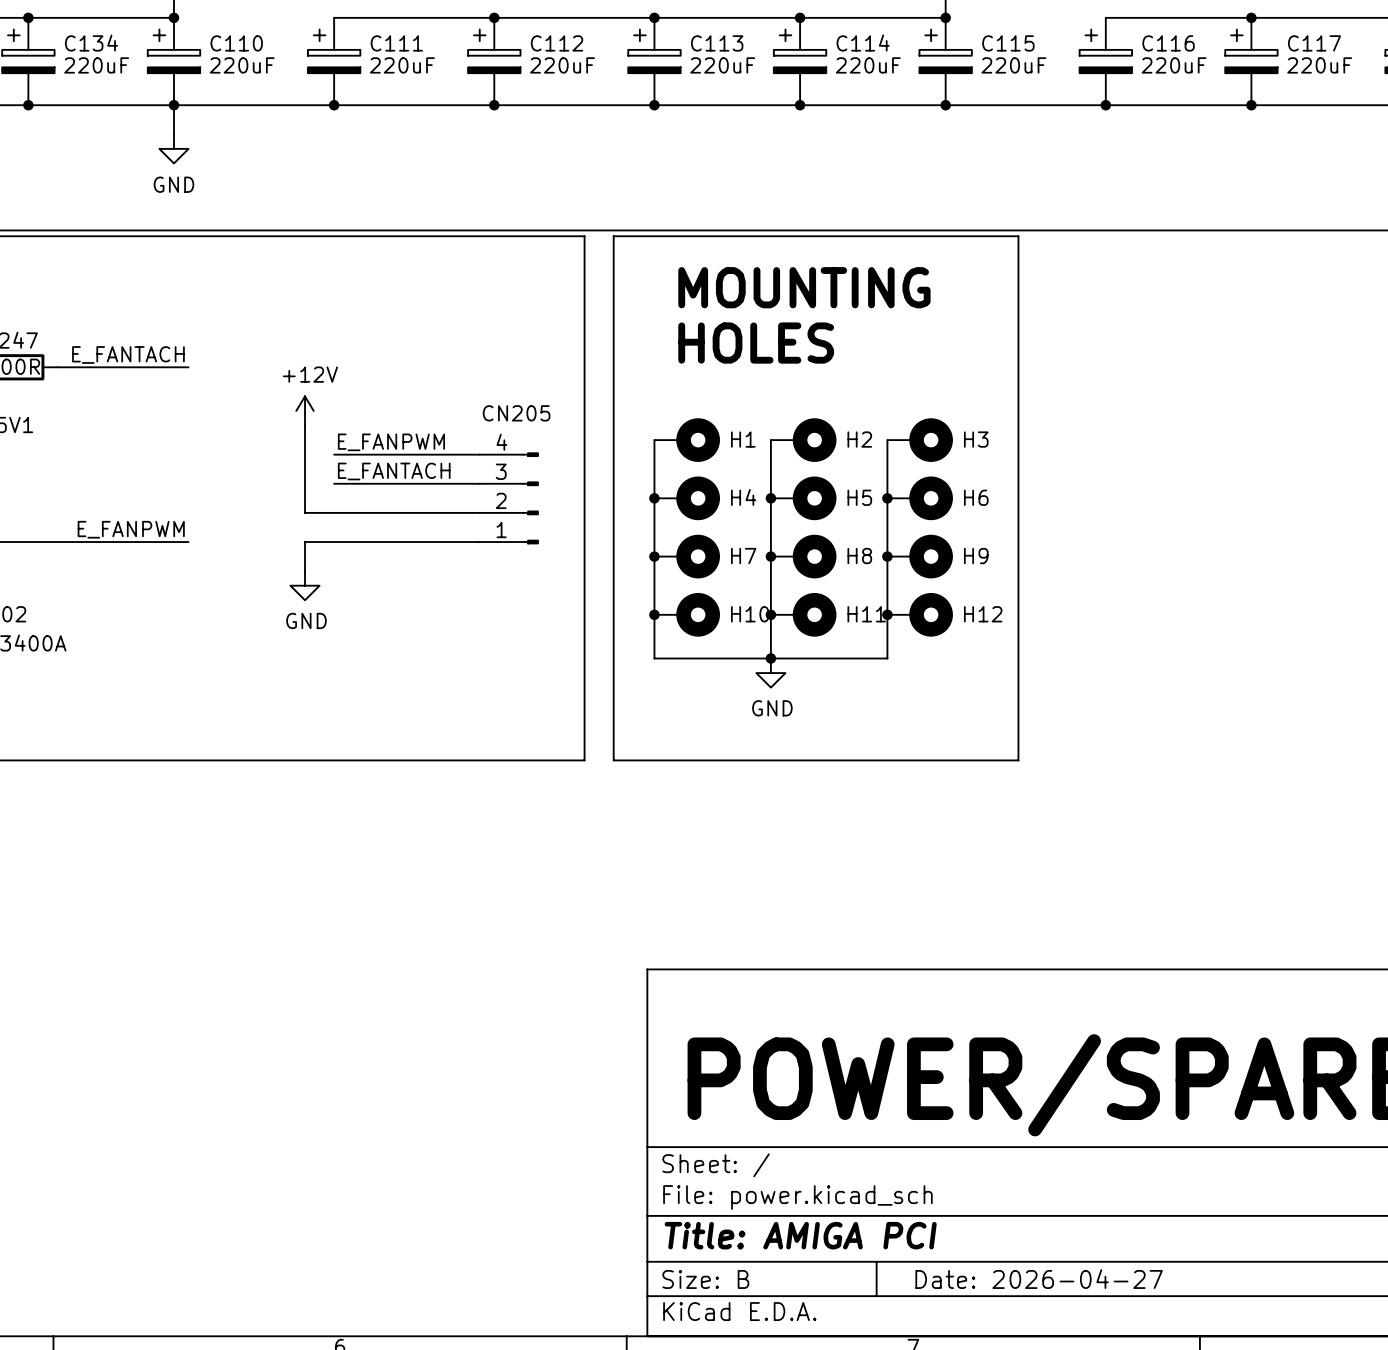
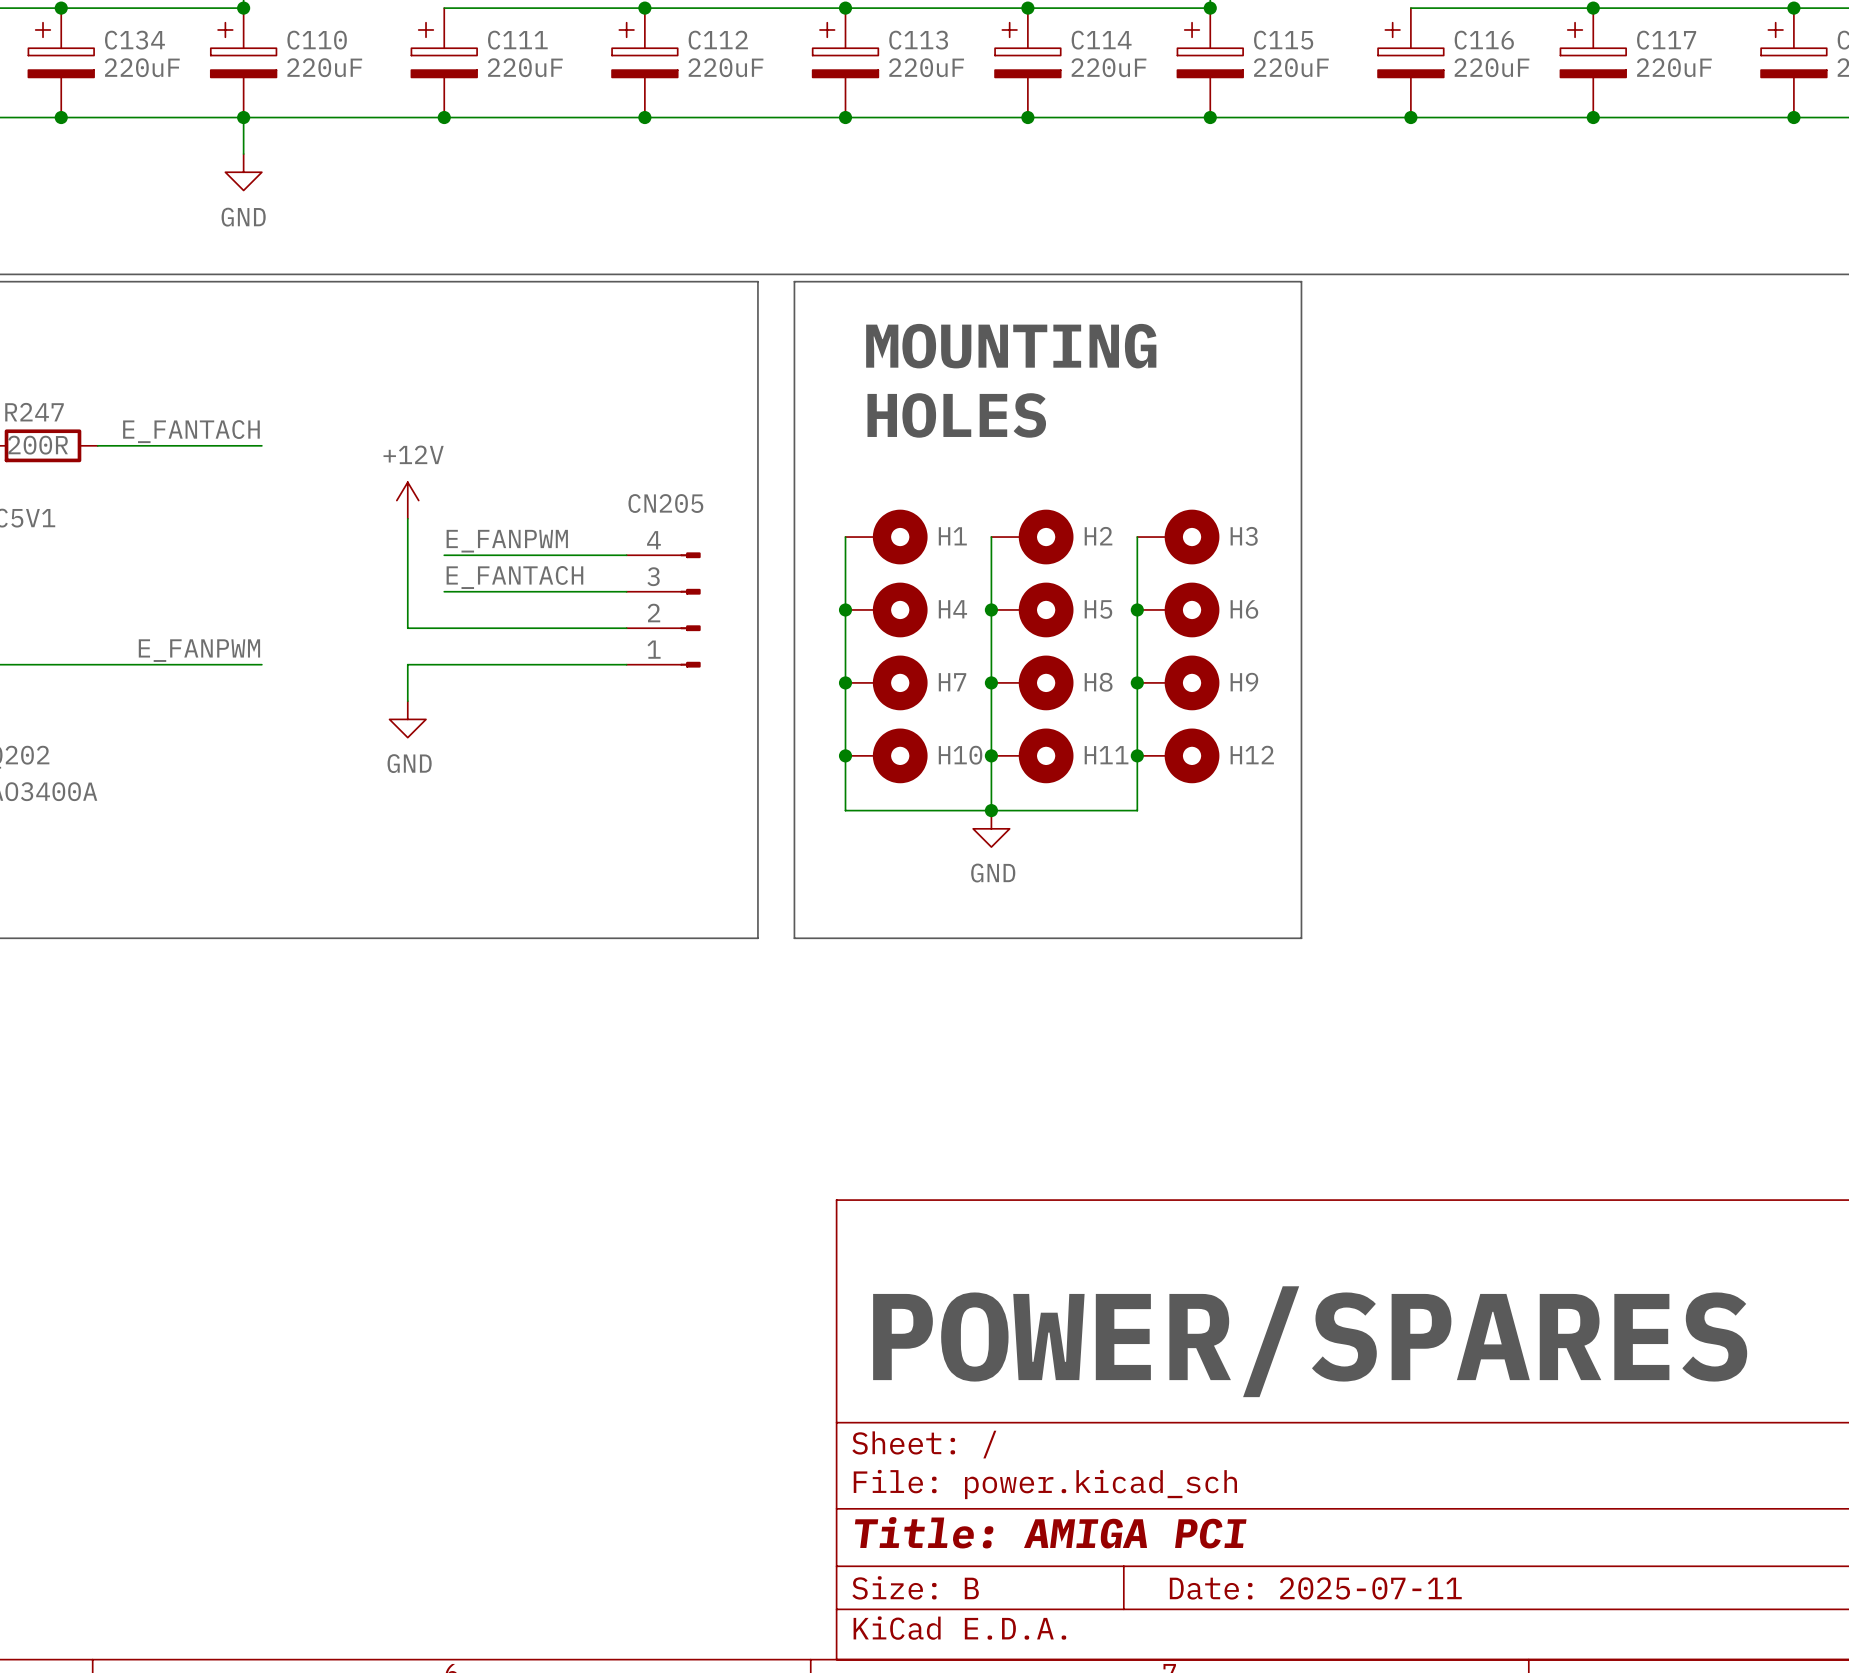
title block: Date: 2026-04-27 (1039, 1279) -> Date: 2025-07-11 (1315, 1588)

